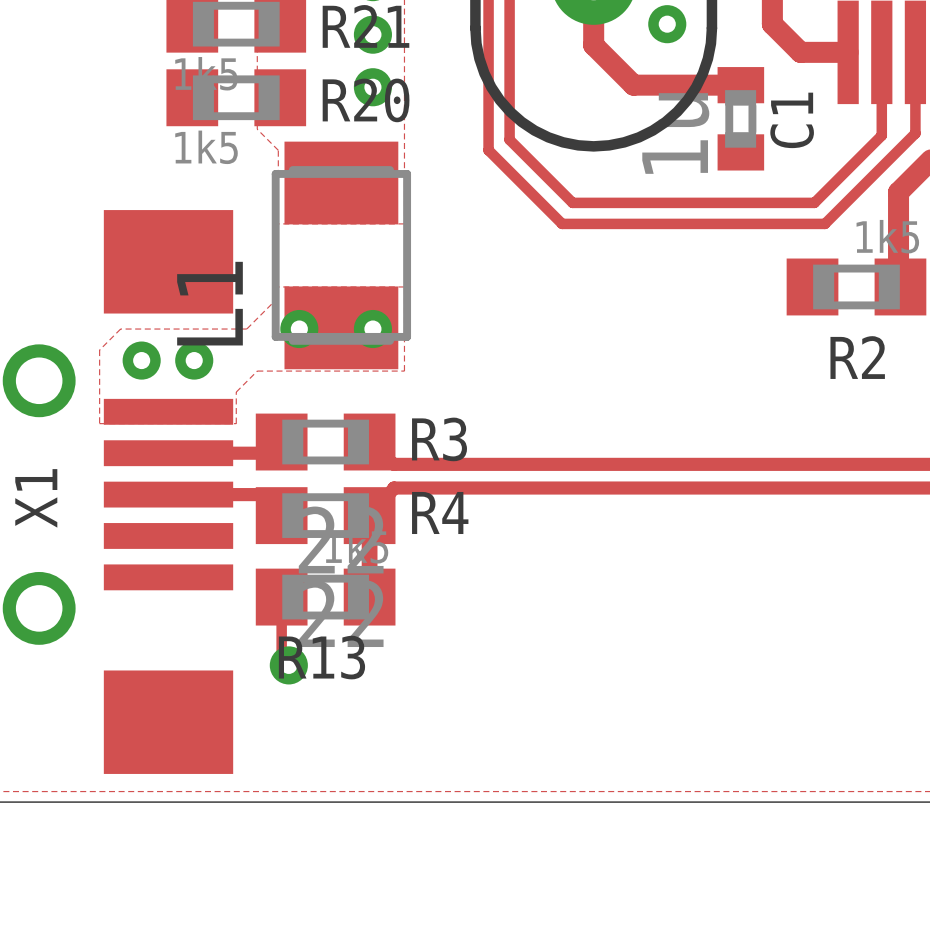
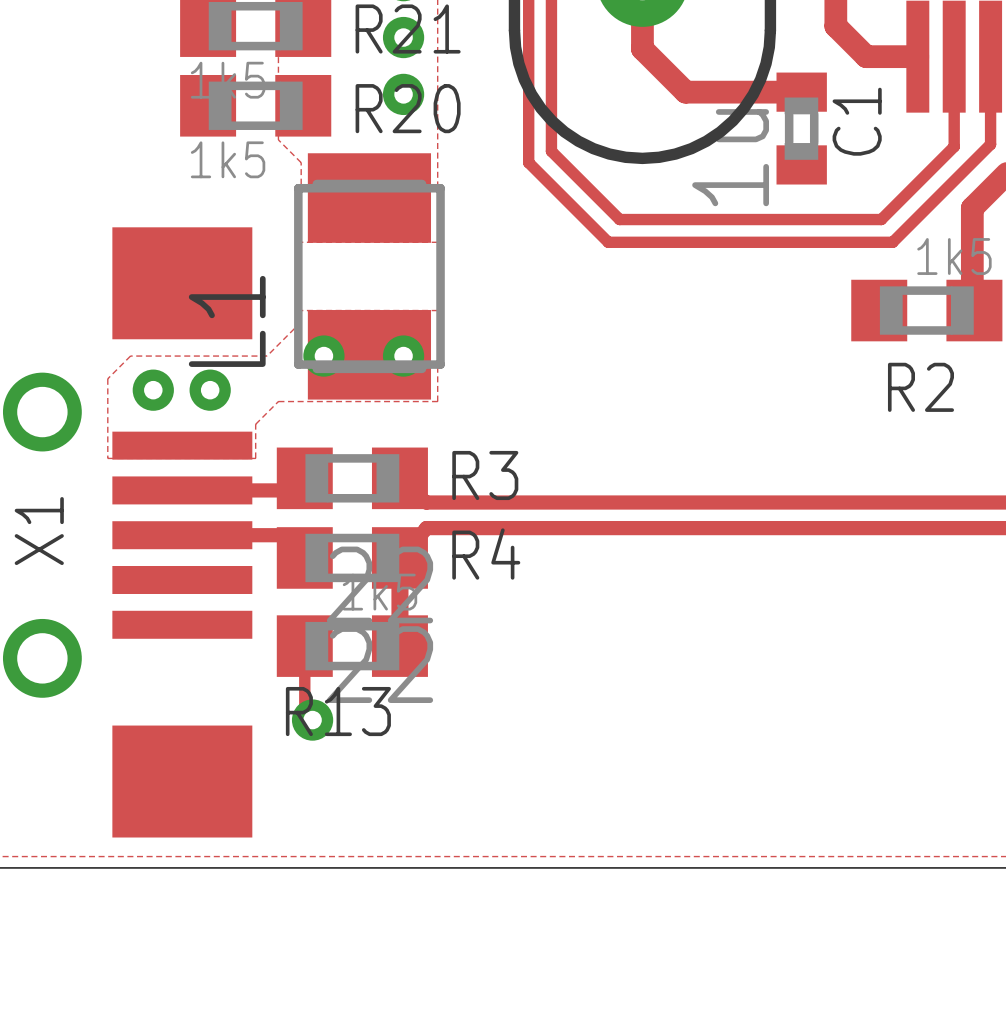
via: (667, 24) -> none

